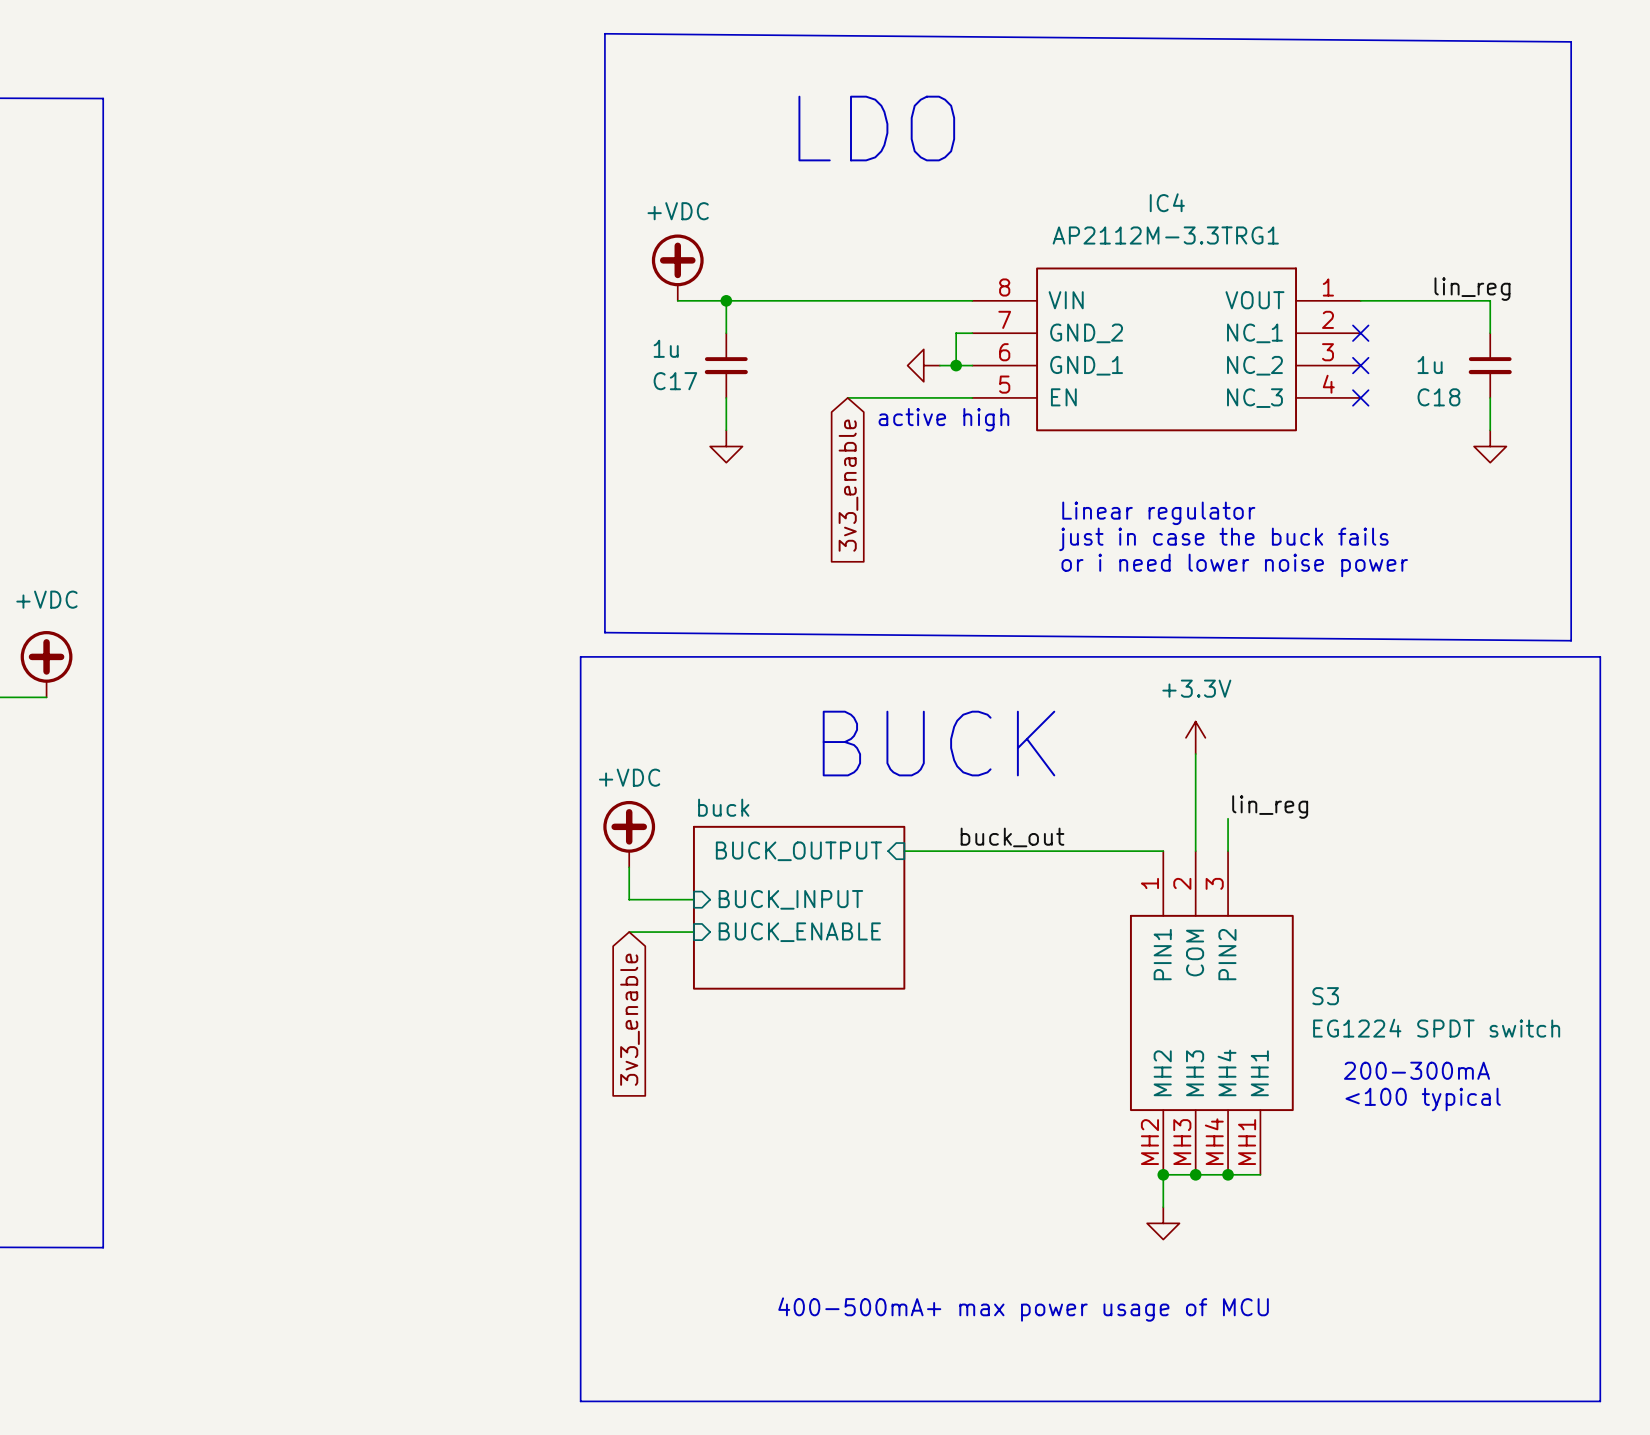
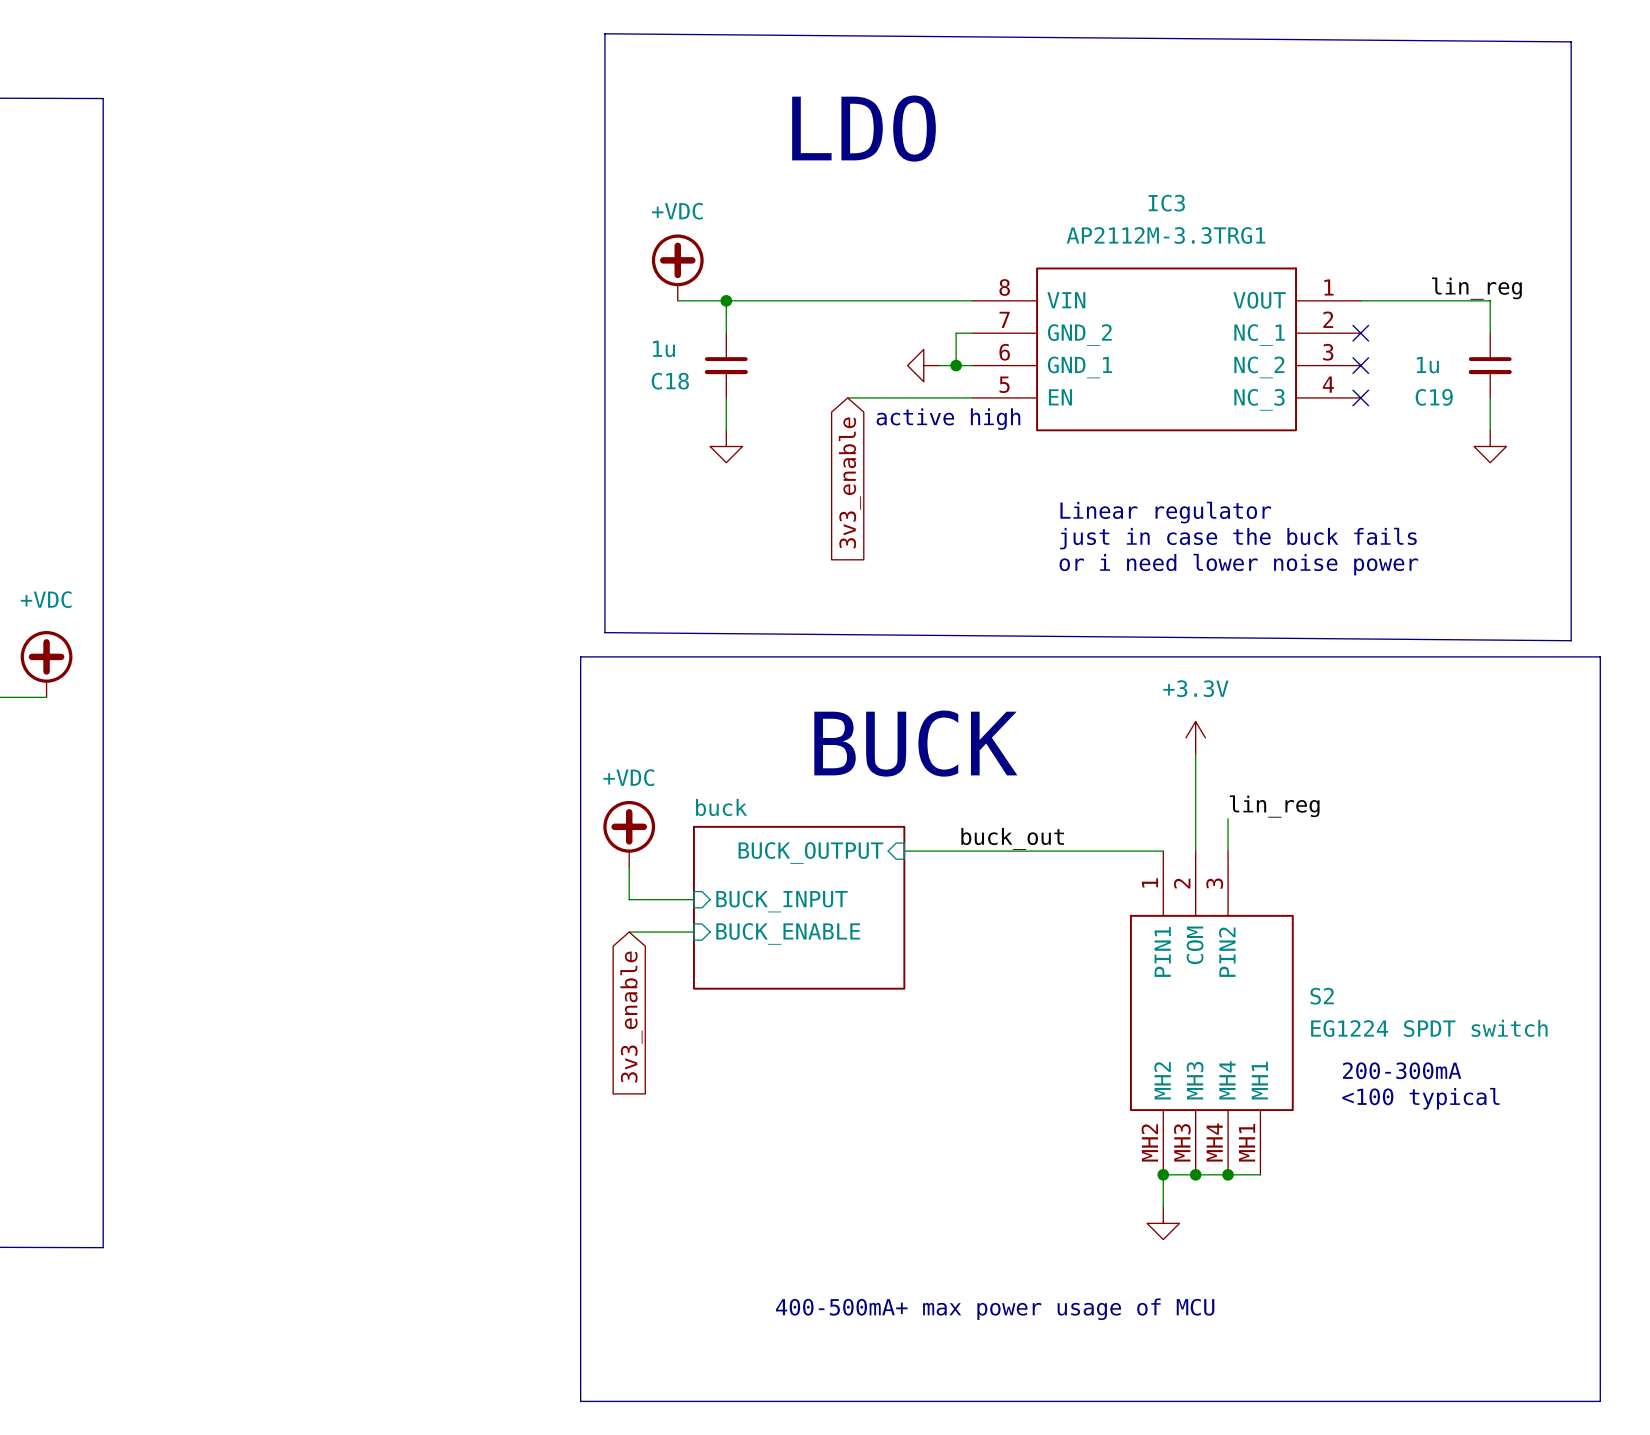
IC4 name: IC4 (1167, 202) -> IC3 (1166, 203)
C17 name: C17 (675, 381) -> C18 (670, 381)
C18 name: C18 (1438, 397) -> C19 (1434, 397)
S3 name: S3 (1325, 996) -> S2 (1322, 996)

